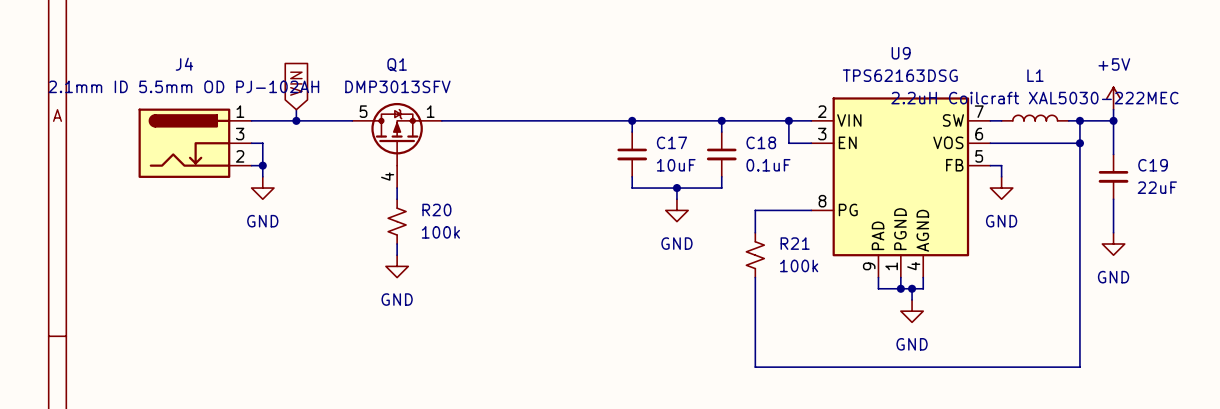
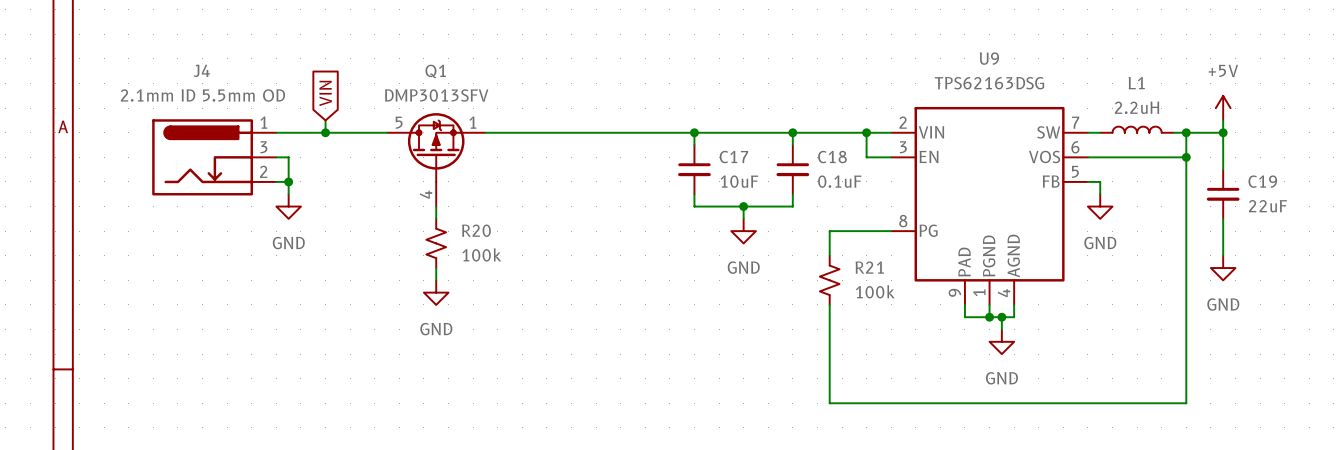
J4 value: 2.1mm ID 5.5mm OD PJ-102AH (183, 86) -> 2.1mm ID 5.5mm OD (202, 95)
L1 value: 2.2uH Coilcraft XAL5030-222MEC (1034, 98) -> 2.2uH (1136, 107)

